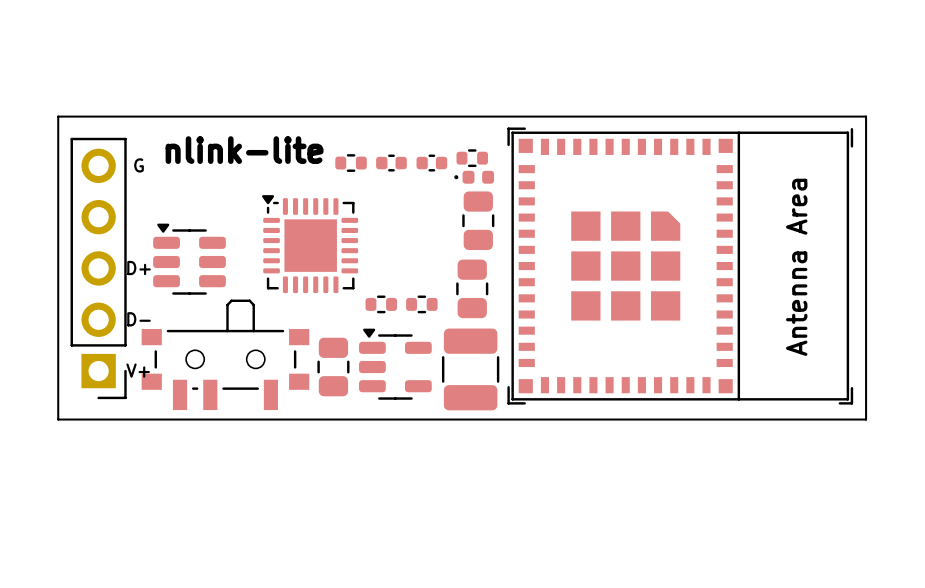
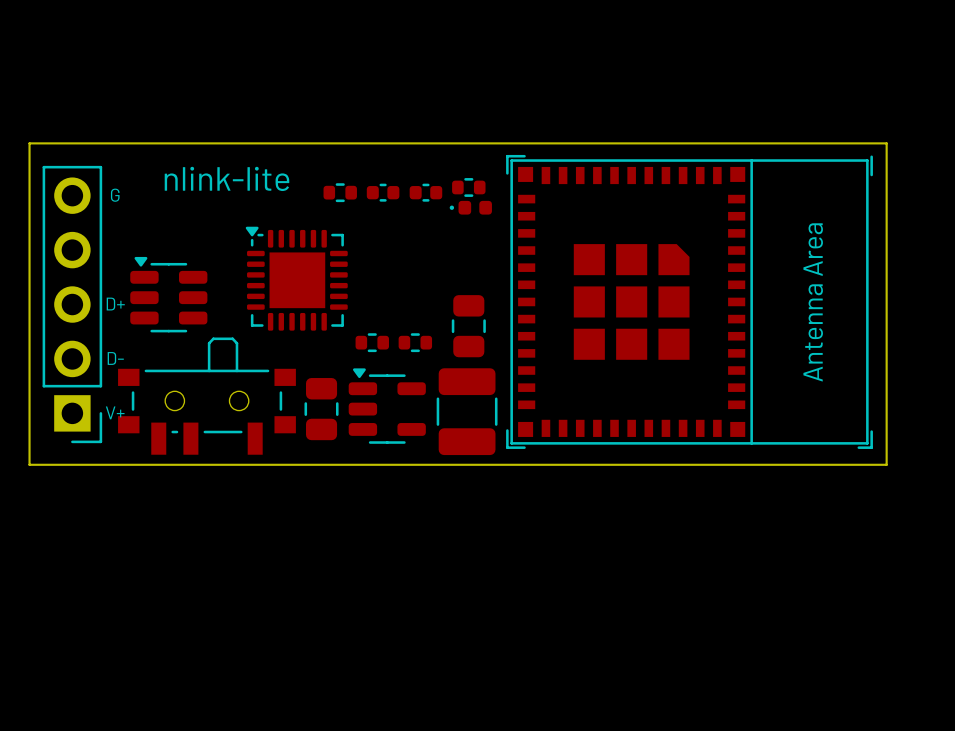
part: (478, 220) -> none

